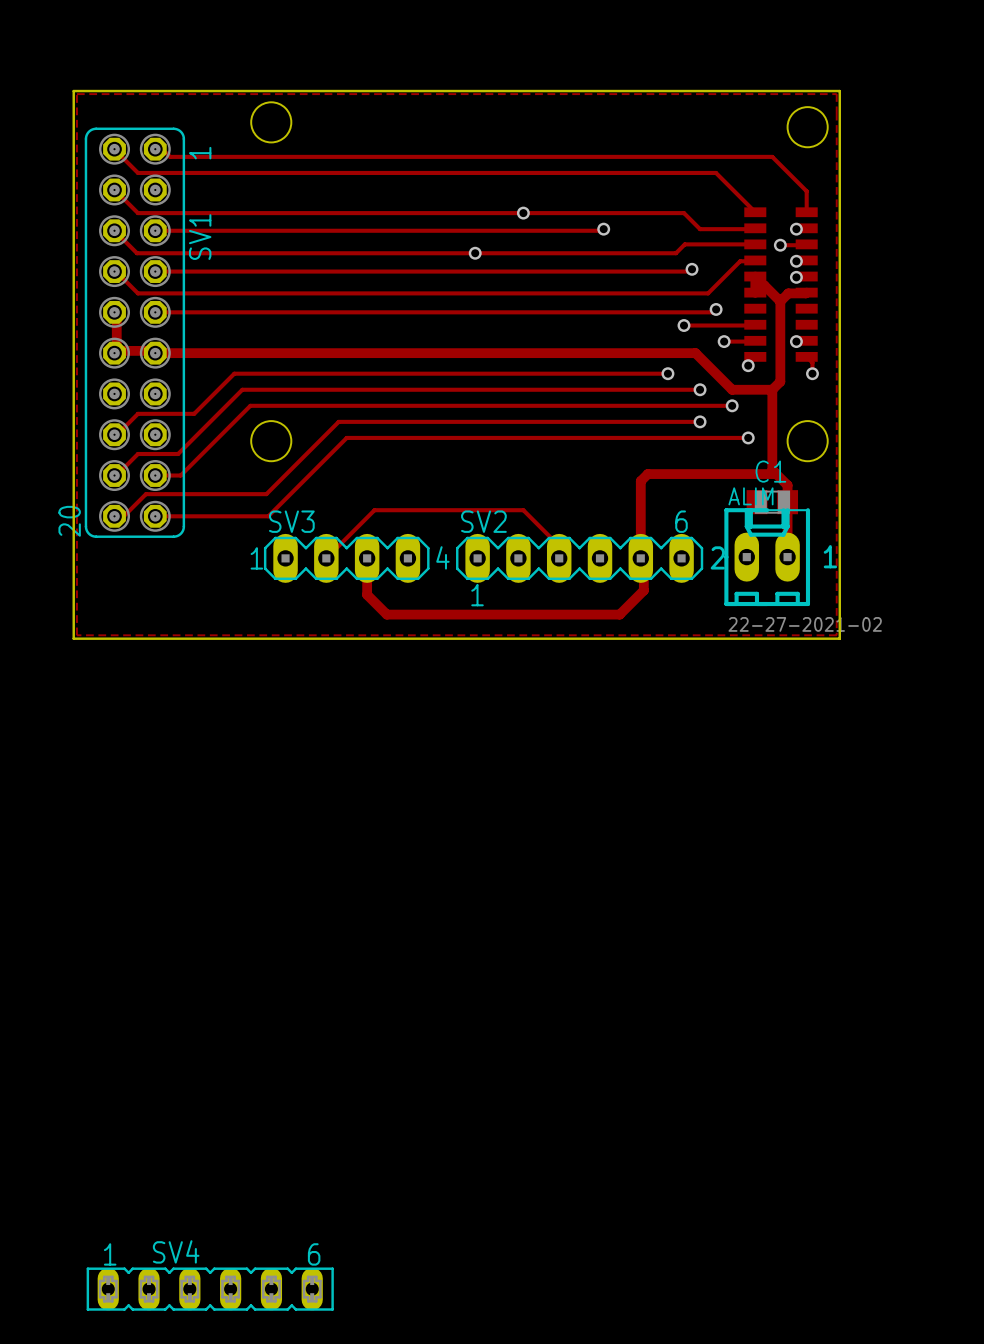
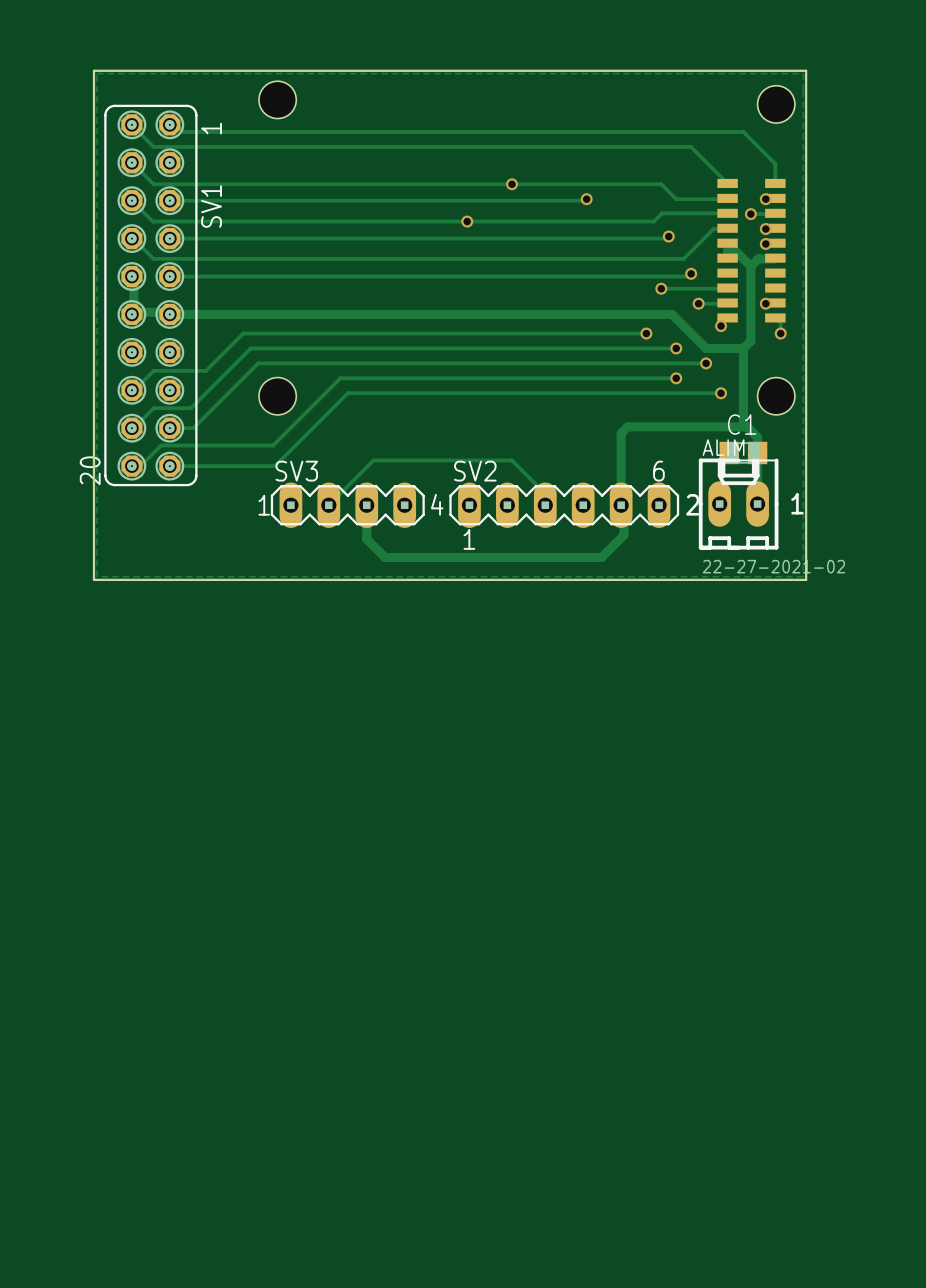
SV4: (210, 1289) -> none

